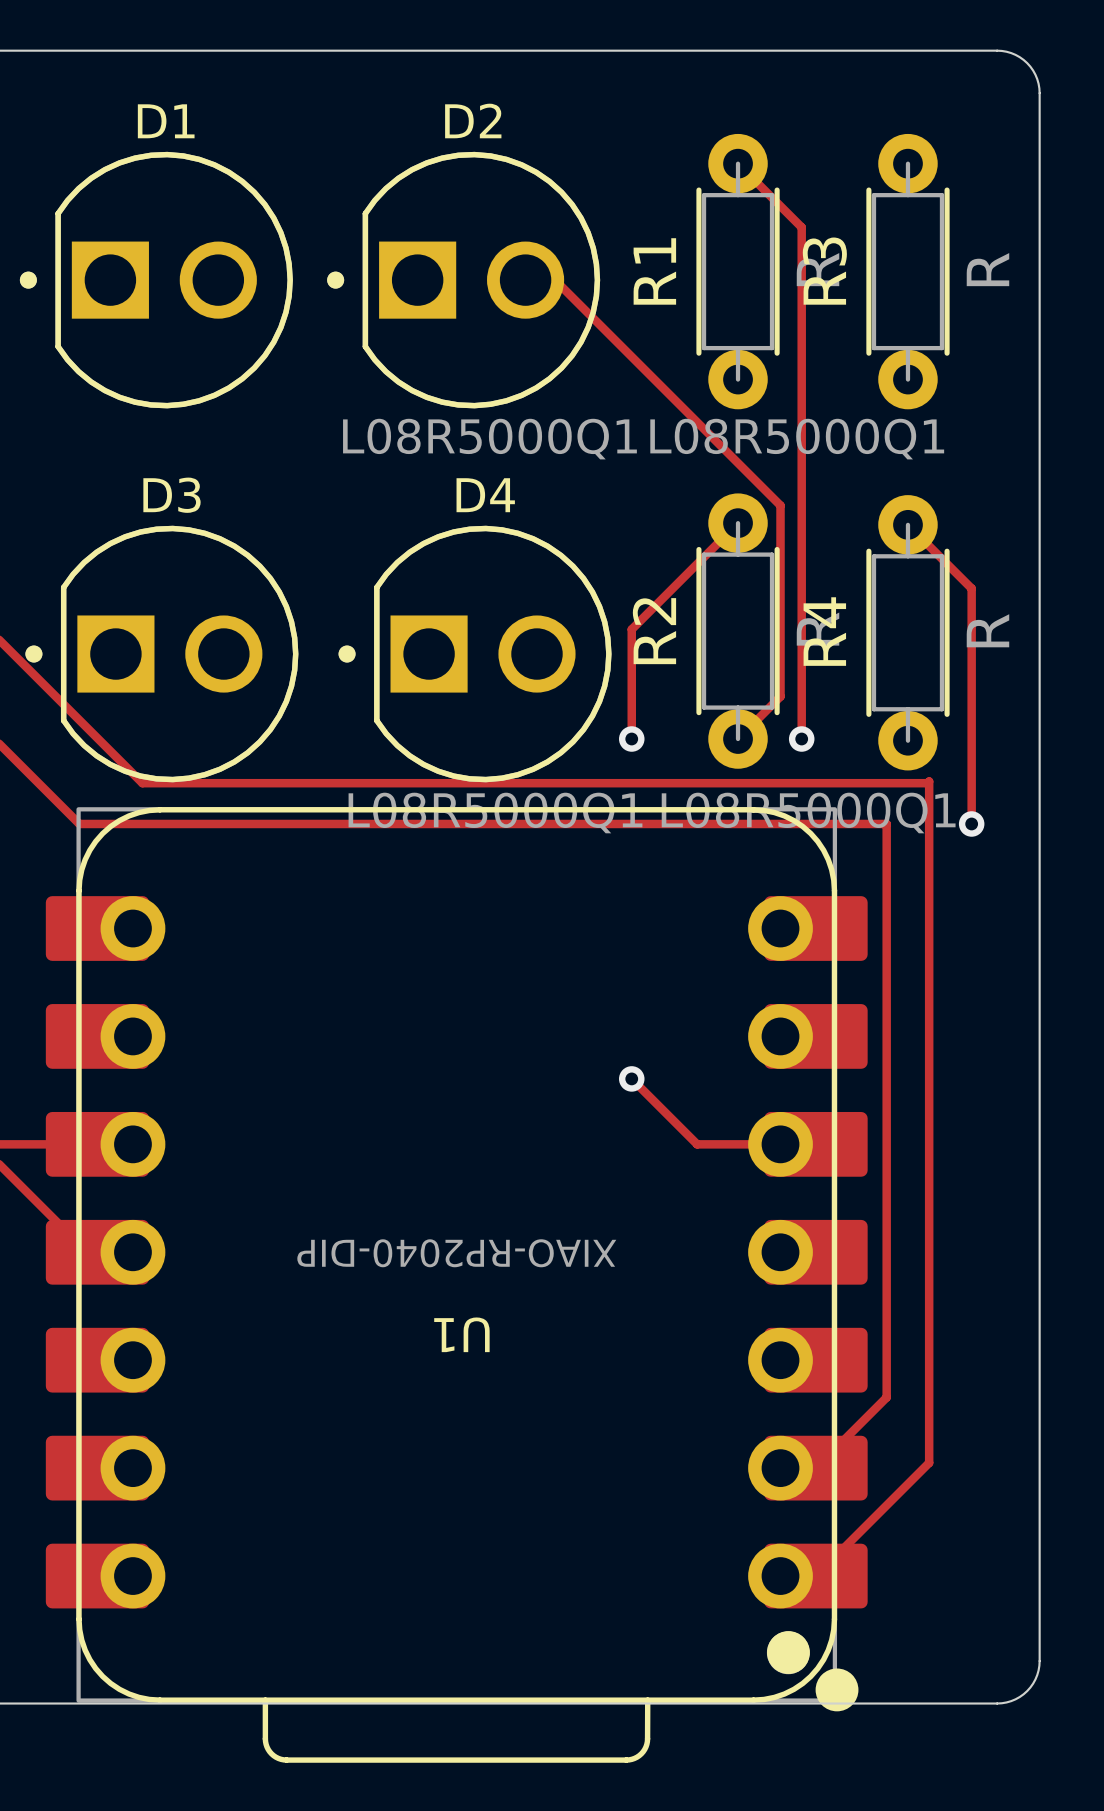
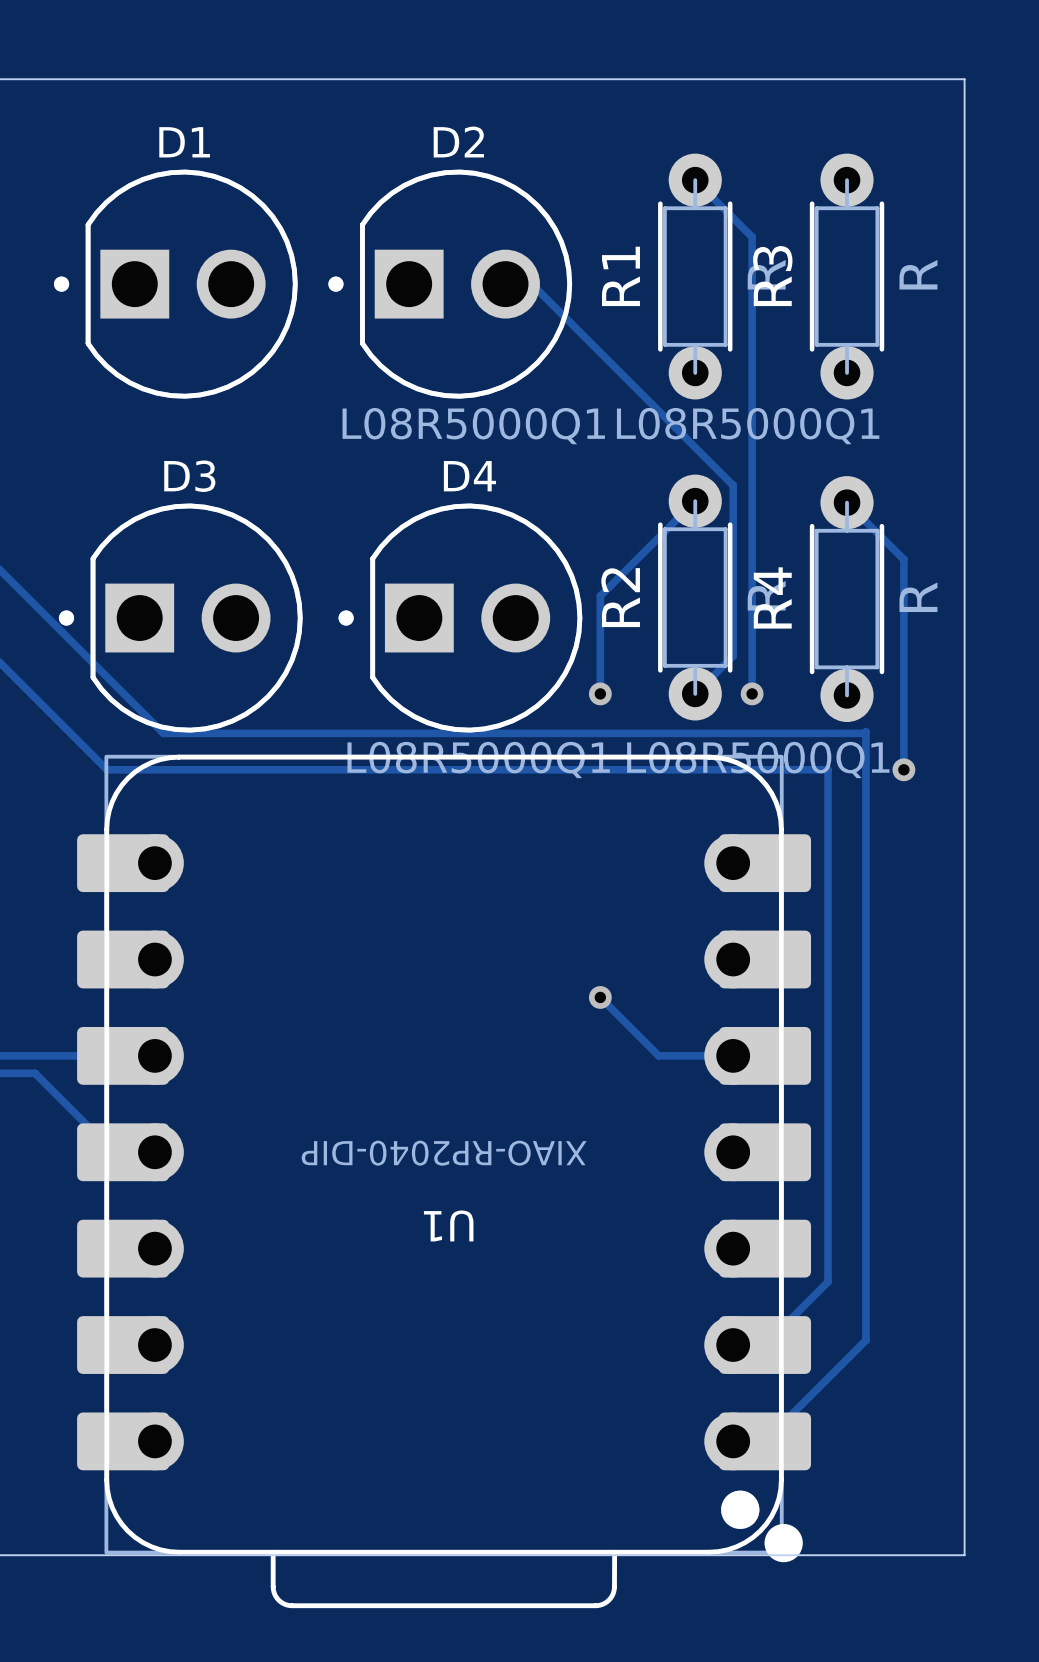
board edge: (997, 50) (1011, 53) (1027, 63) (1037, 79) (1039, 93) -> (926, 79) (964, 79) (964, 117)
board edge: (1039, 1661) (1035, 1679) (1027, 1691) (1011, 1701) (997, 1703) -> (964, 1517) (964, 1555) (926, 1555)

